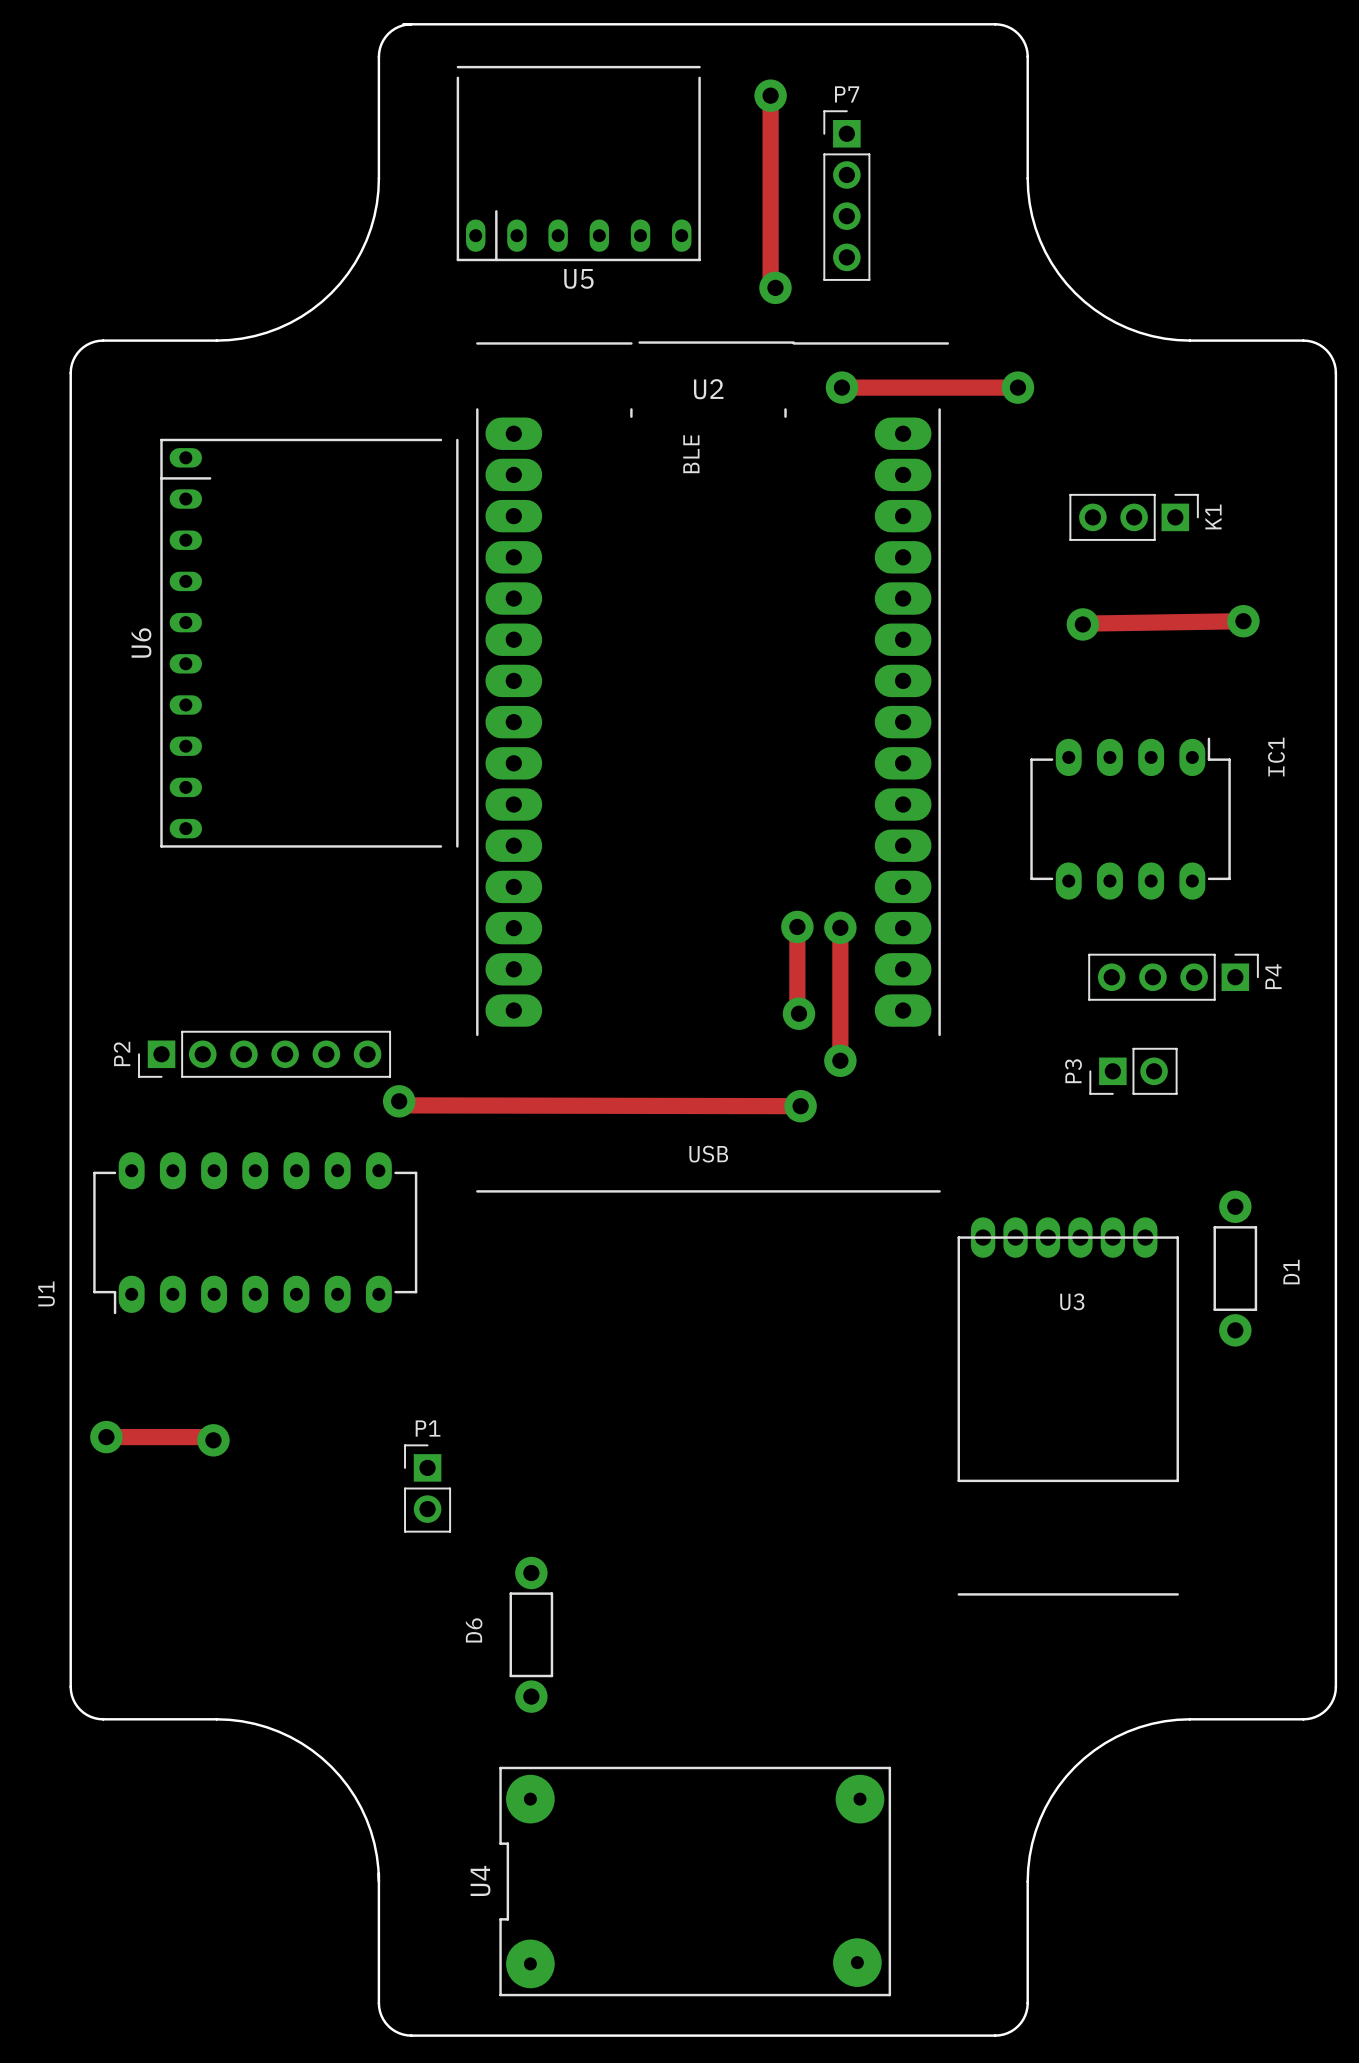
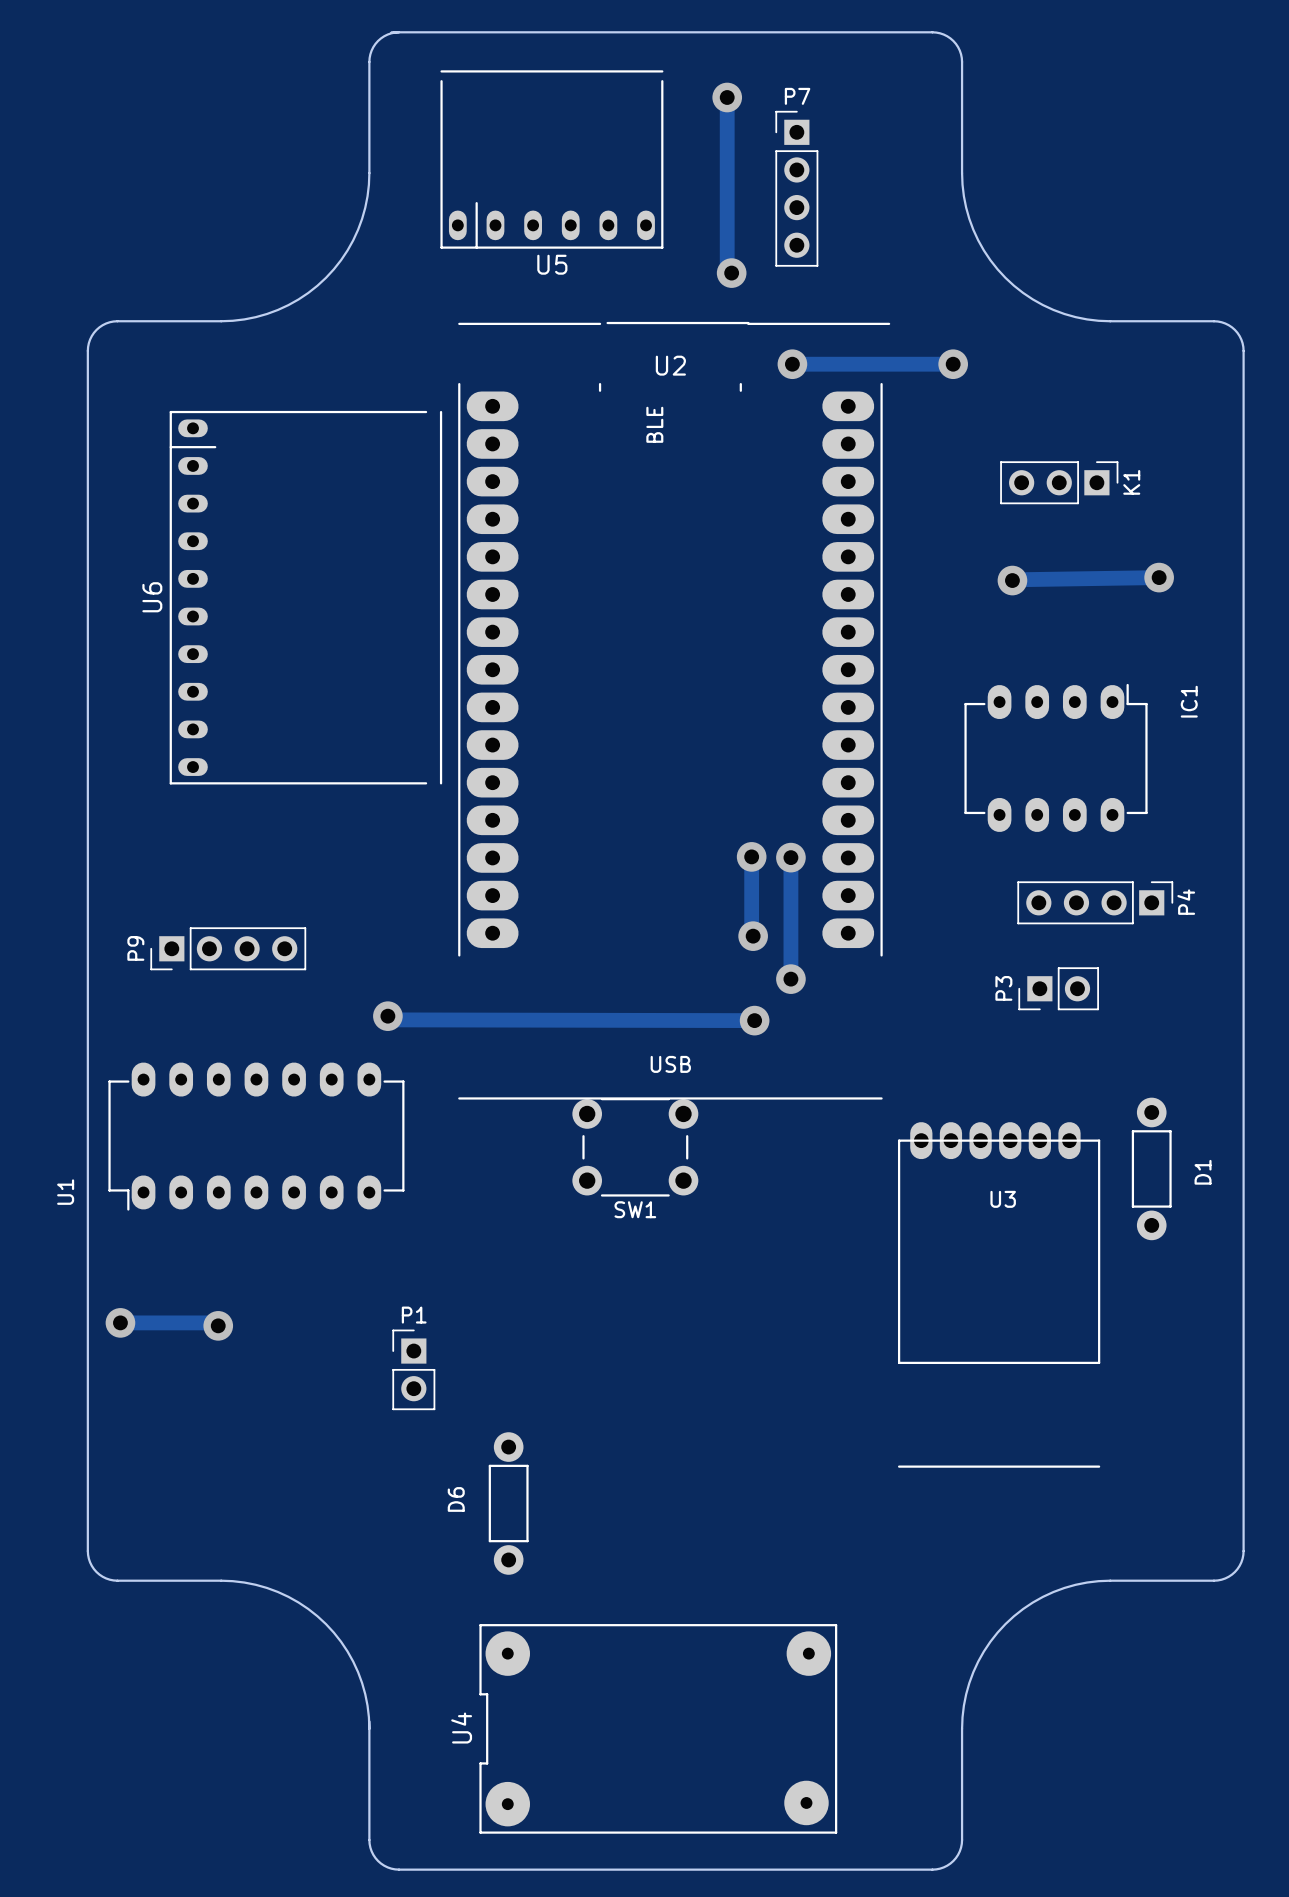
P9: none -> (228, 948)
P2: (264, 1054) -> none
SW1: none -> (635, 1147)

